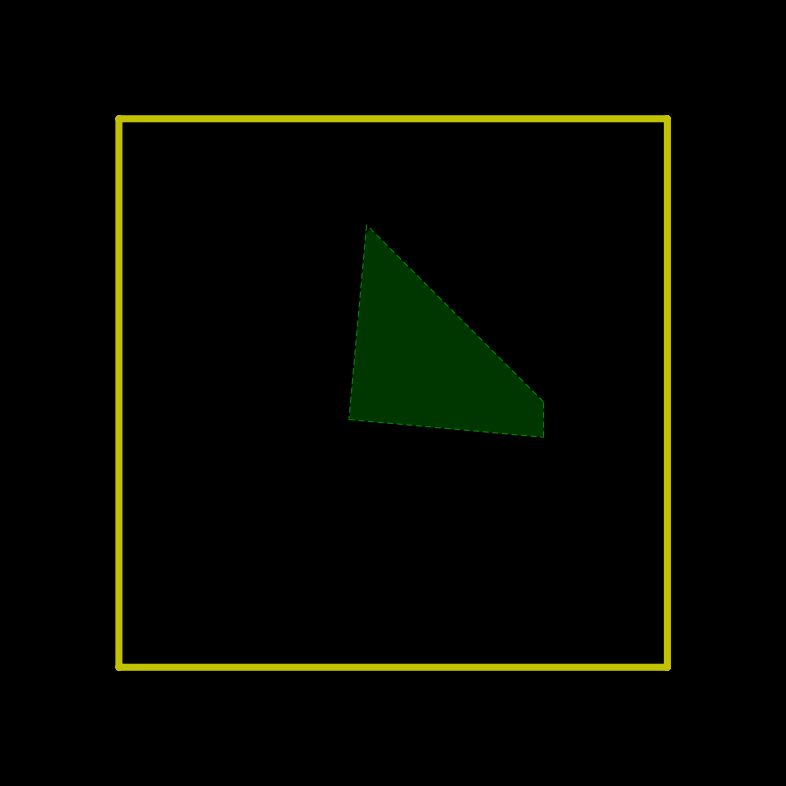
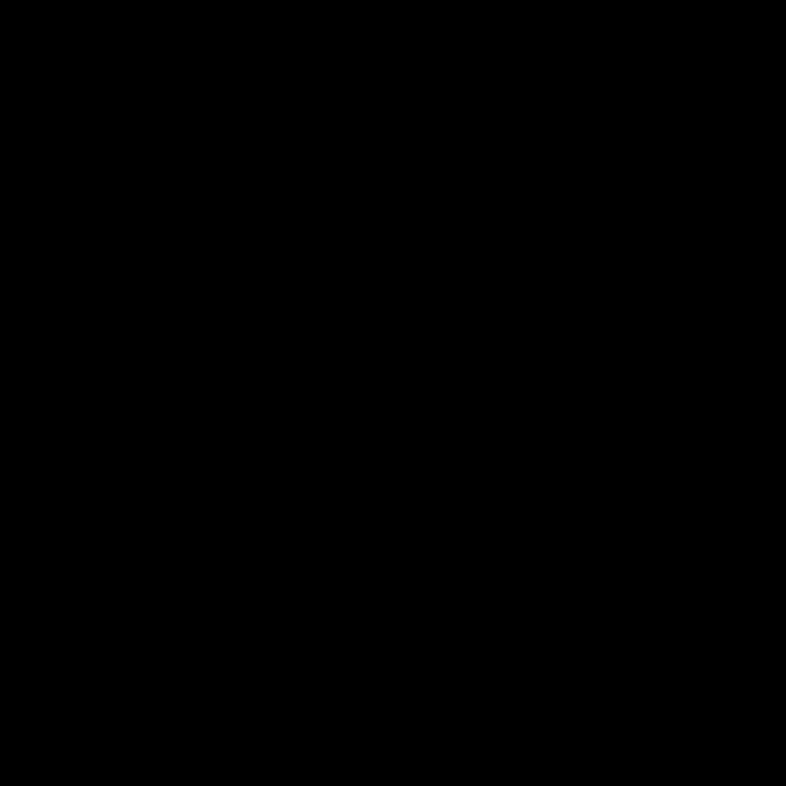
board edge: (667, 118) (118, 118) (118, 667) (667, 667) (667, 118) -> none
zone outline: (366, 224) (348, 419) (543, 437) (543, 401) (366, 224) -> none

